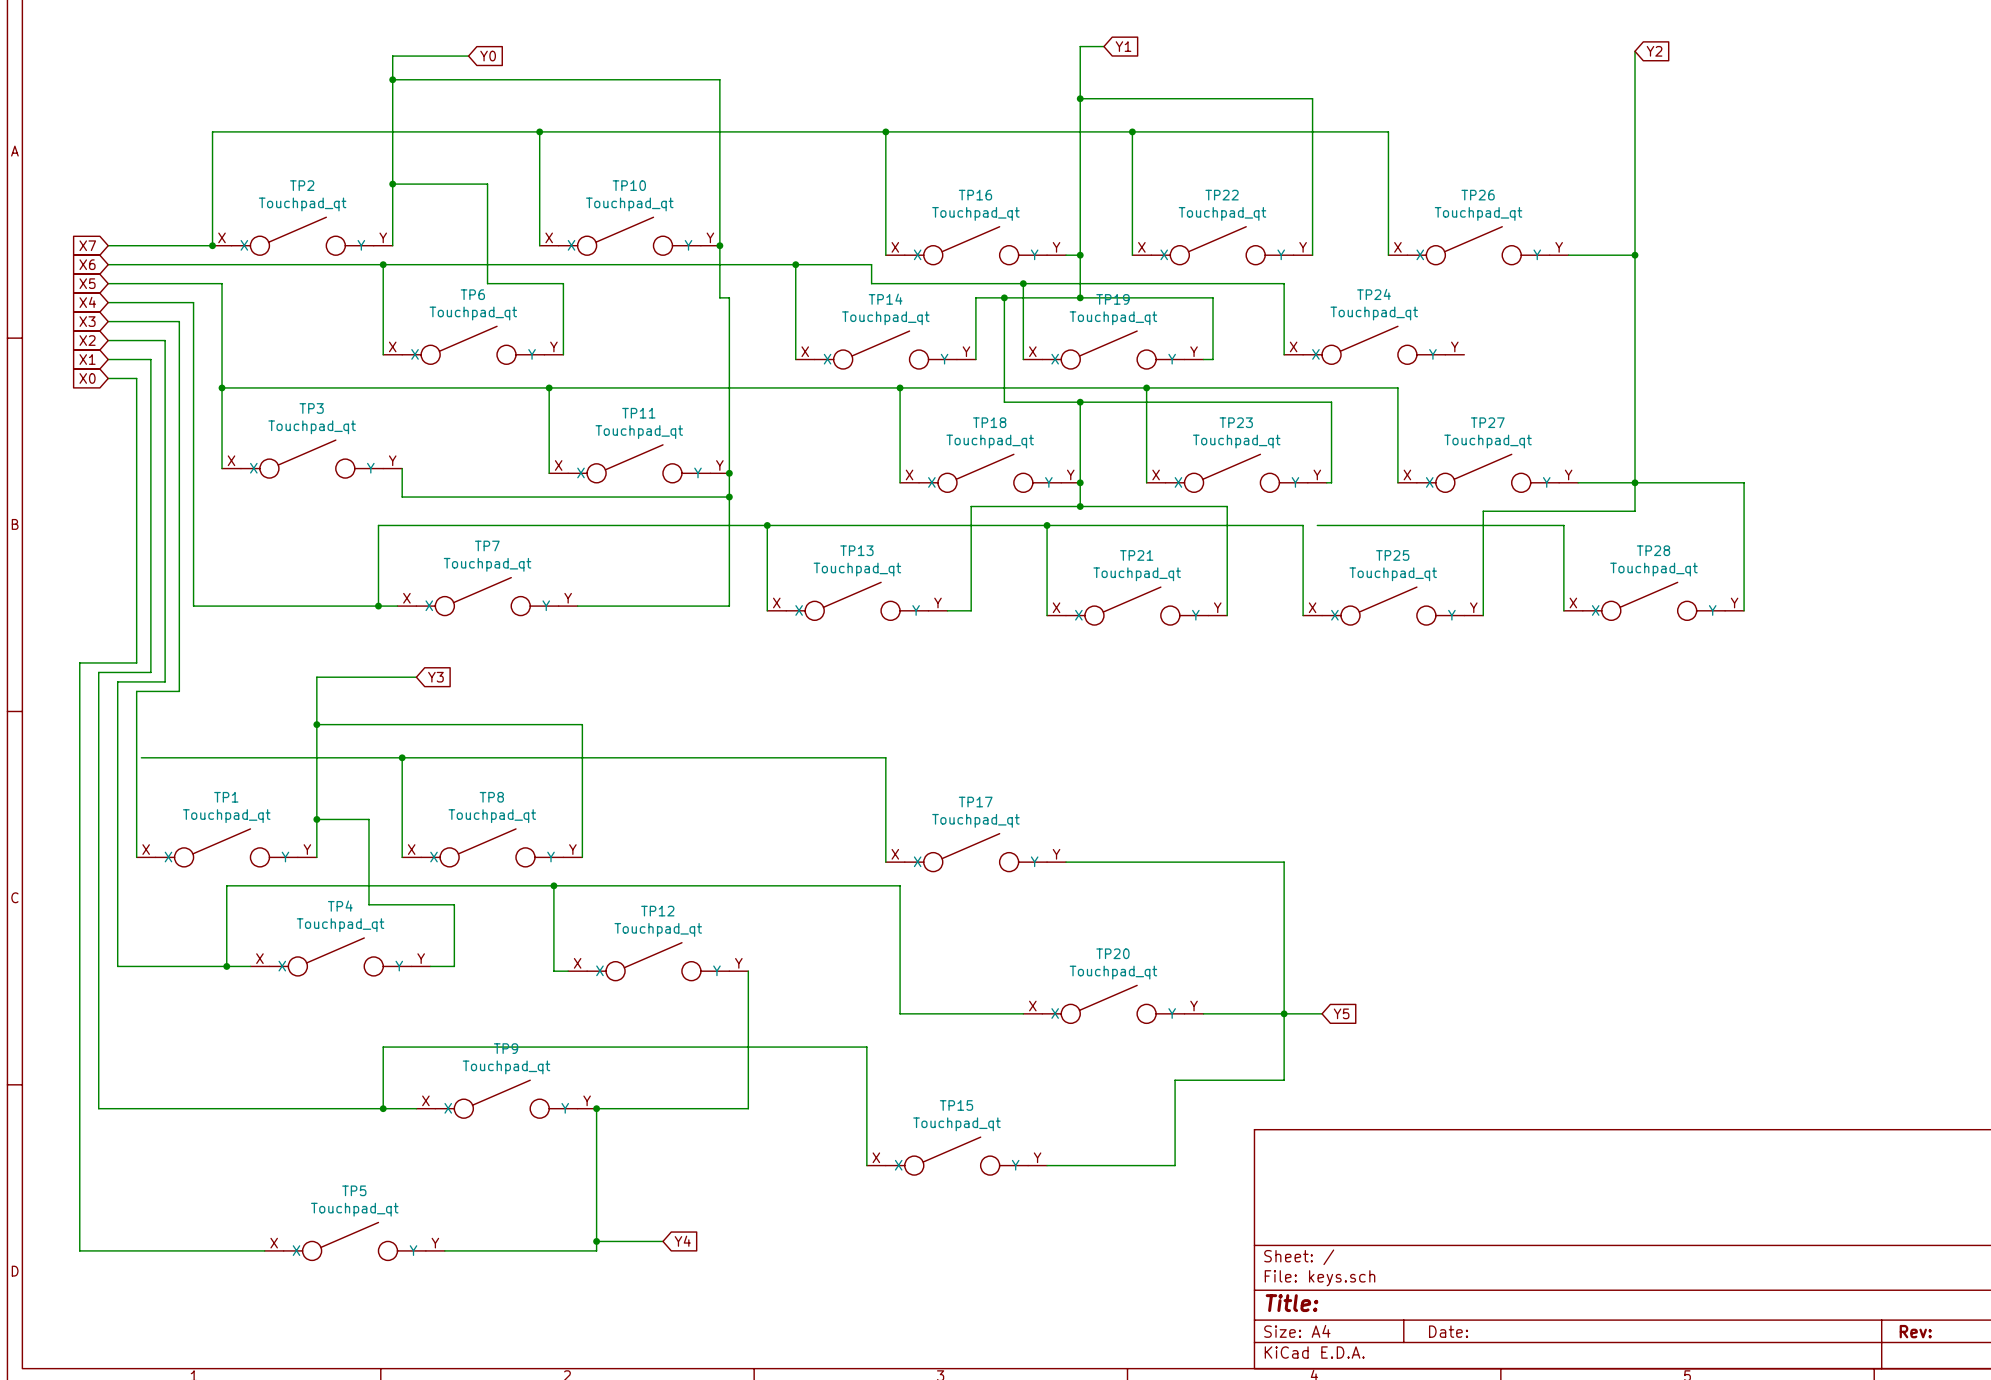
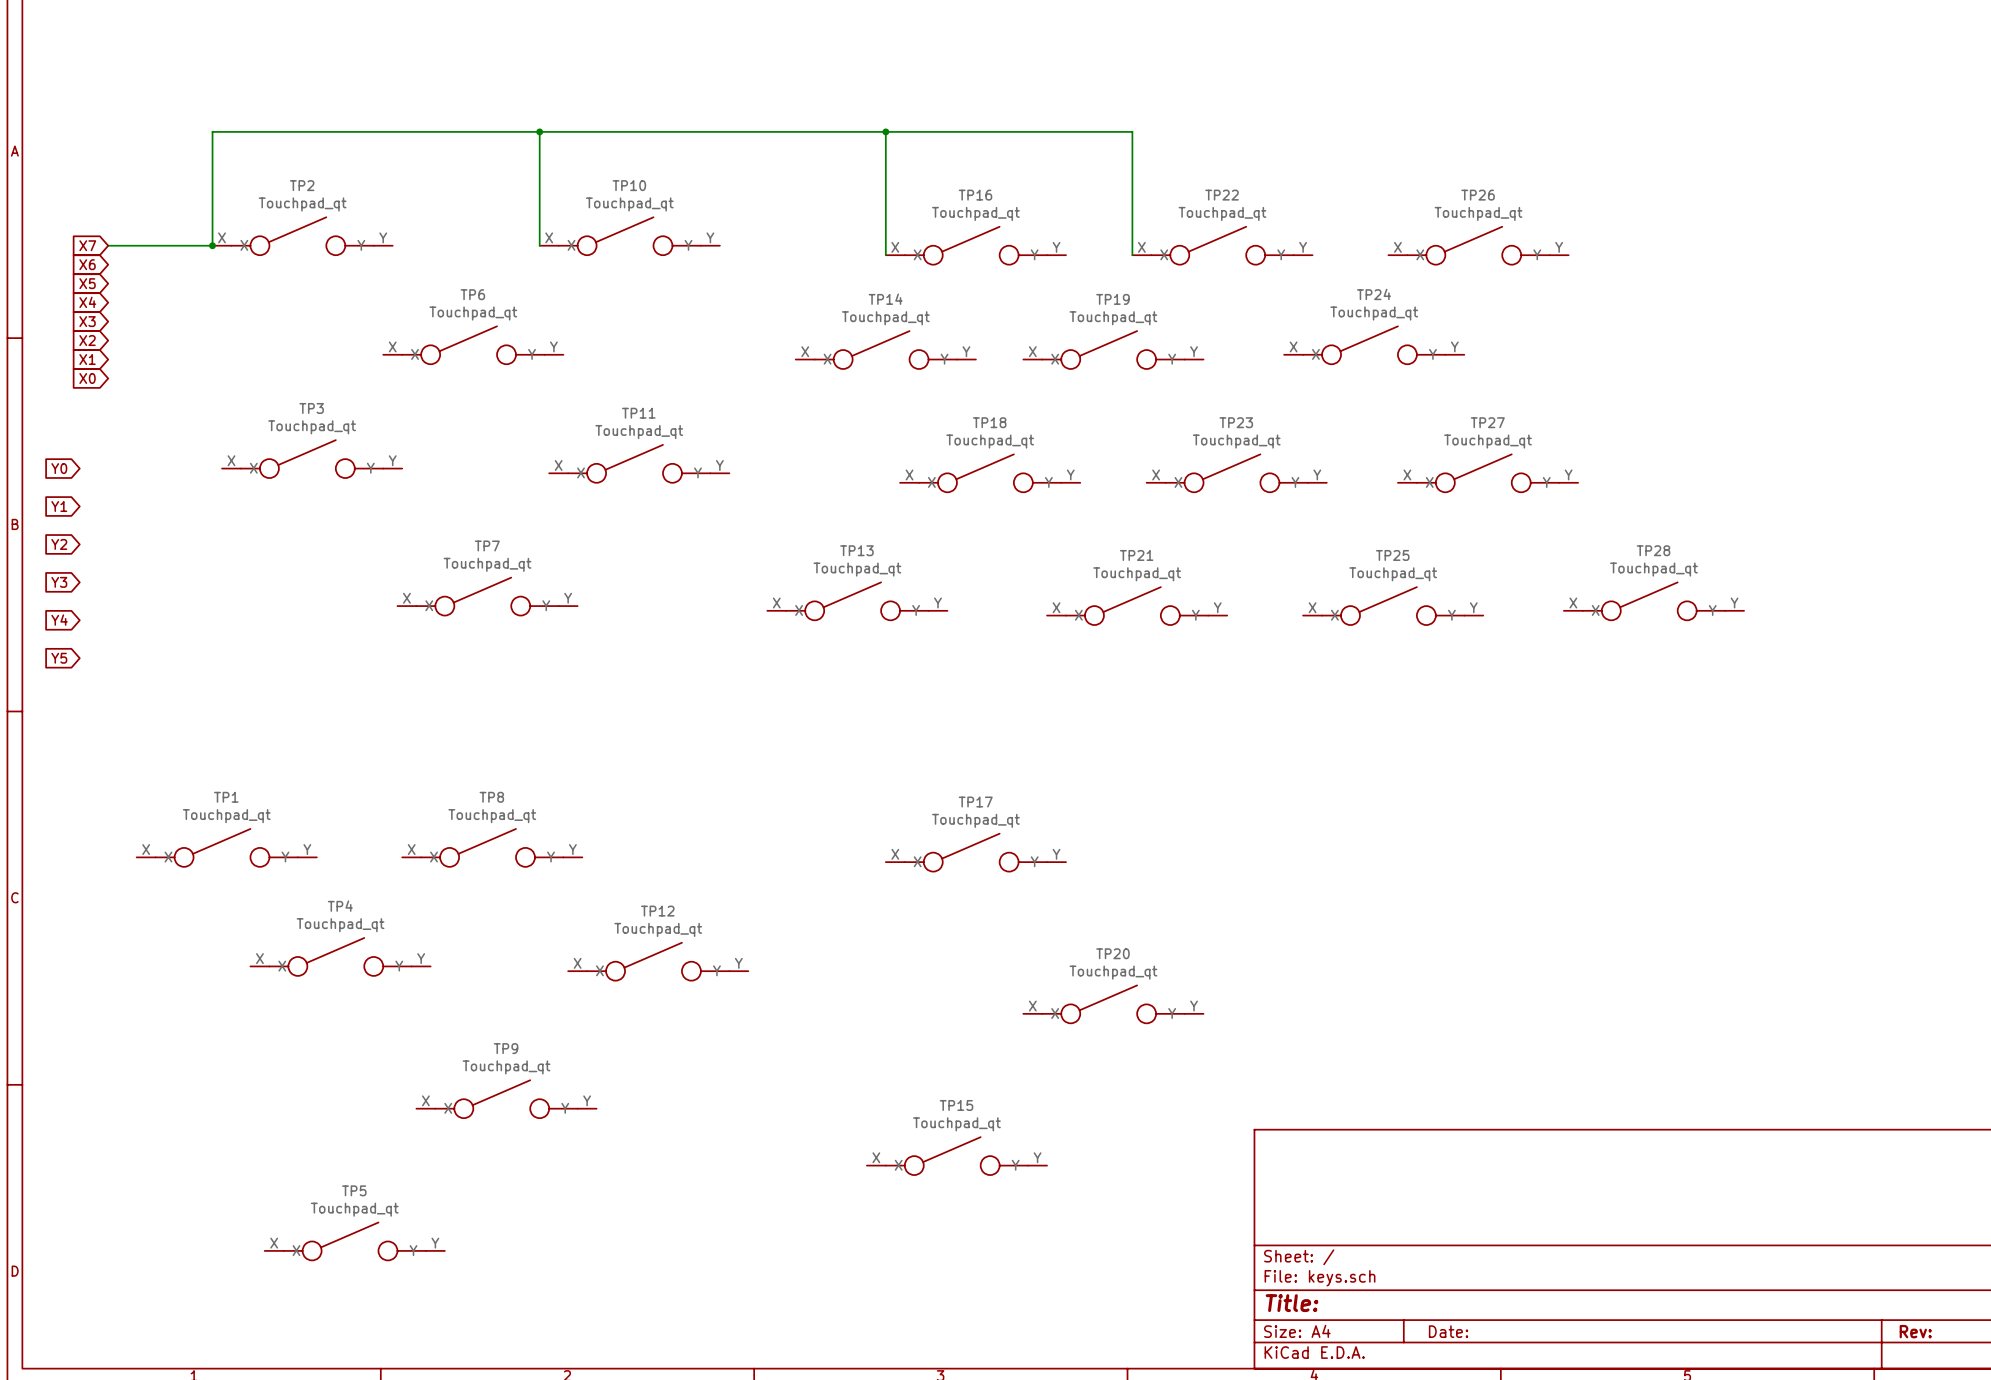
wire: (1103, 46) (1080, 46) (1080, 297) -> none
global label: Y1 (1123, 46) -> none
wire: (1635, 51) (1635, 511) (1483, 511) (1483, 615) -> none
global label: Y2 (1654, 51) -> none
wire: (468, 56) (392, 56) (392, 245) -> none
global label: Y0 (488, 56) -> none
wire: (392, 79) (719, 79) (719, 297) (729, 297) (729, 606) (577, 606) -> none
junction: (392, 79) -> none
wire: (1080, 98) (1312, 98) (1312, 255) -> none
junction: (1080, 98) -> none
wire: (1132, 131) (1388, 131) (1388, 255) -> none
junction: (1132, 131) -> none
wire: (392, 184) (487, 184) (487, 283) (563, 283) (563, 354) -> none
junction: (392, 184) -> none
junction: (719, 245) -> none
wire: (1066, 255) (1080, 255) -> none
junction: (1080, 255) -> none
wire: (1568, 255) (1635, 255) -> none
junction: (1635, 255) -> none
wire: (108, 264) (871, 264) (871, 283) (1284, 283) (1284, 354) -> none
wire: (383, 264) (383, 354) -> none
junction: (383, 264) -> none
wire: (795, 264) (795, 359) -> none
junction: (795, 264) -> none
wire: (108, 283) (222, 283) (222, 468) -> none
wire: (1023, 283) (1023, 359) -> none
junction: (1023, 283) -> none
wire: (1004, 297) (1004, 402) (1331, 402) (1331, 482) (1326, 482) -> none
junction: (1004, 297) -> none
junction: (1080, 297) -> none
wire: (108, 302) (193, 302) (193, 606) (397, 606) -> none
wire: (108, 321) (179, 321) (179, 691) (136, 691) (136, 857) -> none
wire: (108, 340) (165, 340) (165, 681) (117, 681) (117, 966) (250, 966) -> none
wire: (108, 359) (150, 359) (150, 672) (98, 672) (98, 1108) (416, 1108) -> none
wire: (975, 359) (975, 297) (1213, 297) (1213, 359) (1203, 359) -> none
wire: (108, 378) (136, 378) (136, 662) (79, 662) (79, 1250) (264, 1250) -> none
wire: (222, 387) (1397, 387) (1397, 482) -> none
junction: (222, 387) -> none
wire: (549, 387) (549, 473) -> none
junction: (549, 387) -> none
wire: (900, 387) (900, 482) -> none
junction: (900, 387) -> none
wire: (1146, 387) (1146, 482) -> none
junction: (1146, 387) -> none
wire: (1080, 402) (1080, 506) -> none
junction: (1080, 402) -> none
global label: none -> Y0 (59, 468)
wire: (402, 468) (402, 497) (729, 497) -> none
junction: (729, 473) -> none
junction: (1080, 482) -> none
wire: (1578, 482) (1744, 482) (1744, 610) -> none
junction: (1635, 482) -> none
junction: (729, 497) -> none
global label: none -> Y1 (59, 506)
junction: (1080, 506) -> none
wire: (767, 525) (767, 610) -> none
junction: (767, 525) -> none
wire: (1047, 525) (1047, 615) -> none
junction: (1047, 525) -> none
wire: (1317, 525) (1563, 525) (1563, 610) -> none
global label: none -> Y2 (59, 544)
global label: none -> Y3 (59, 582)
wire: (378, 606) (378, 525) (1303, 525) (1303, 615) -> none
junction: (378, 606) -> none
wire: (947, 610) (971, 610) (971, 506) (1227, 506) (1227, 615) -> none
global label: none -> Y4 (59, 620)
global label: none -> Y5 (59, 658)
wire: (416, 677) (316, 677) (316, 857) -> none
global label: Y3 (435, 677) -> none
wire: (316, 724) (582, 724) (582, 857) -> none
junction: (316, 724) -> none
wire: (141, 757) (885, 757) (885, 862) -> none
wire: (402, 757) (402, 857) -> none
junction: (402, 757) -> none
wire: (316, 819) (369, 819) (369, 904) (454, 904) (454, 966) (430, 966) -> none
junction: (316, 819) -> none
wire: (1066, 862) (1284, 862) (1284, 1080) (1175, 1080) (1175, 1165) (1047, 1165) -> none
wire: (553, 885) (553, 971) (568, 971) -> none
junction: (553, 885) -> none
wire: (226, 966) (226, 885) (900, 885) (900, 1013) (1023, 1013) -> none
junction: (226, 966) -> none
wire: (748, 971) (748, 1108) (596, 1108) (596, 1250) (444, 1250) -> none
wire: (1203, 1013) (1322, 1013) -> none
junction: (1284, 1013) -> none
global label: Y5 (1341, 1013) -> none
wire: (383, 1108) (383, 1047) (866, 1047) (866, 1165) -> none
junction: (383, 1108) -> none
junction: (596, 1108) -> none
wire: (596, 1241) (662, 1241) -> none
junction: (596, 1241) -> none
global label: Y4 (682, 1241) -> none

